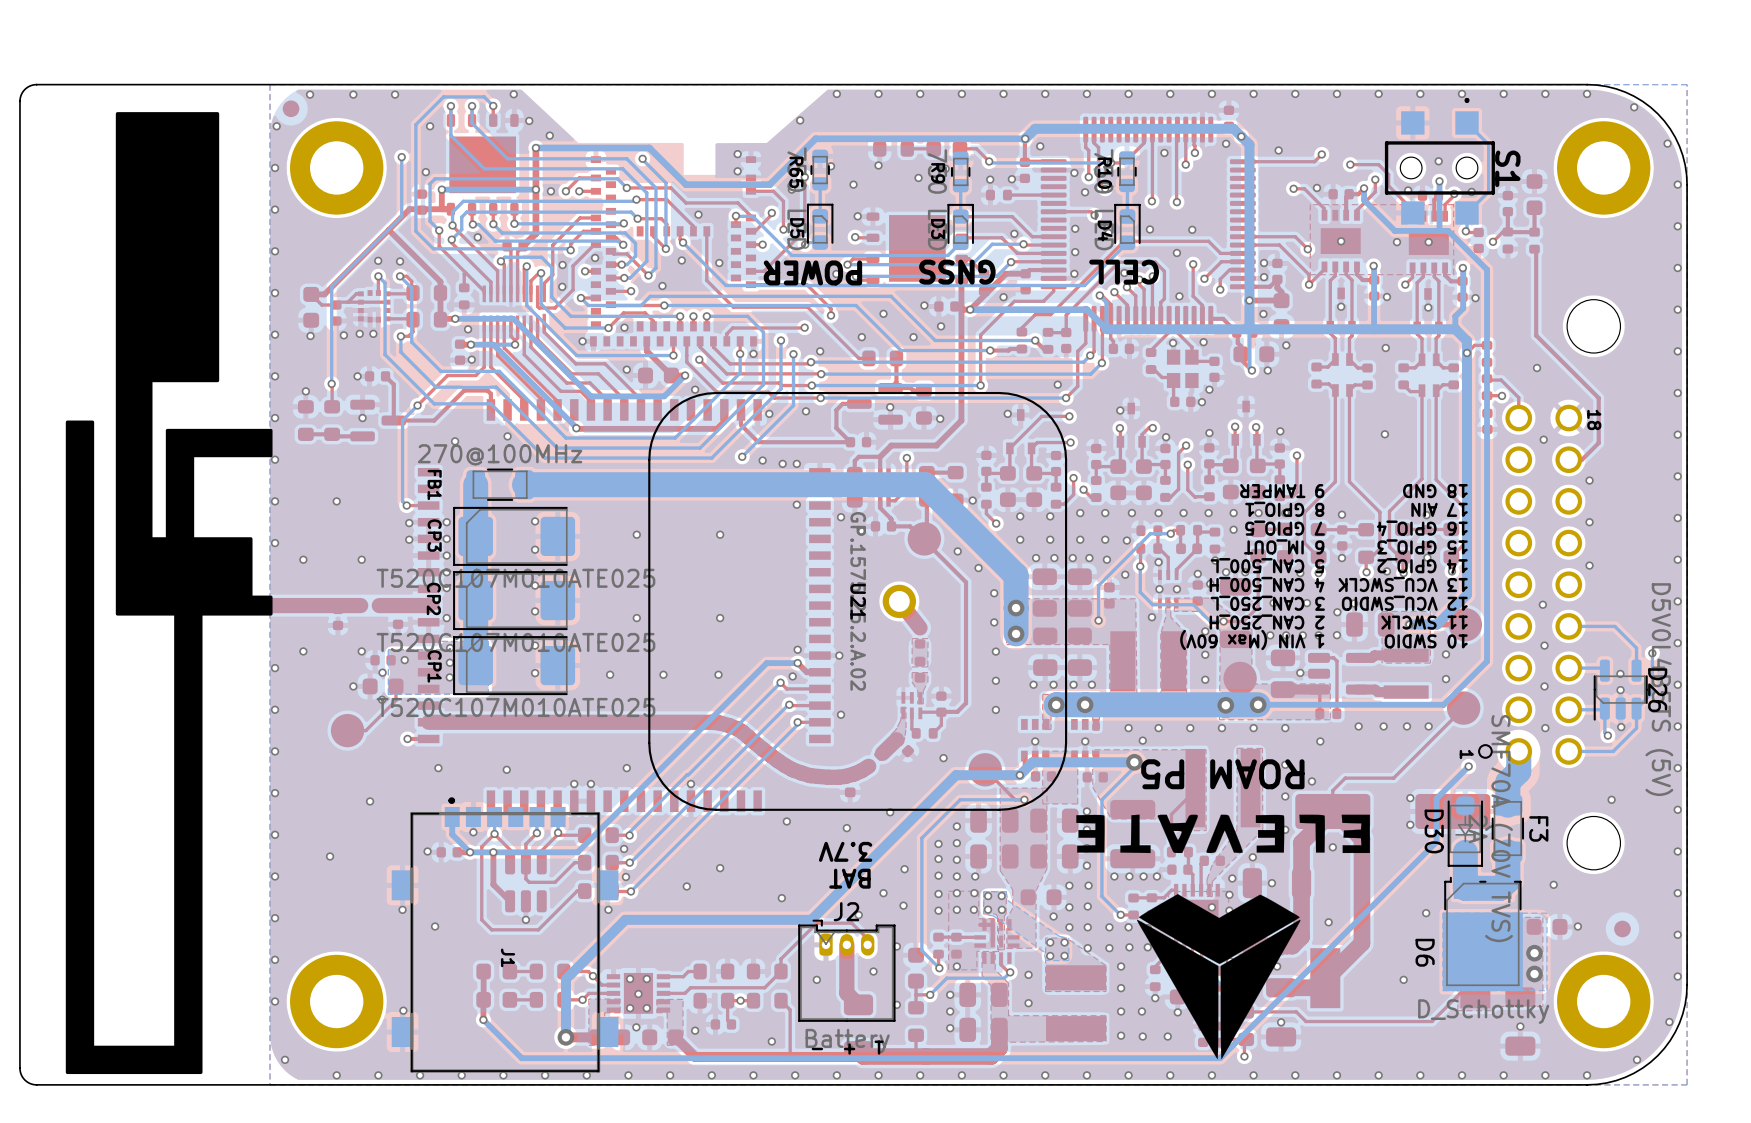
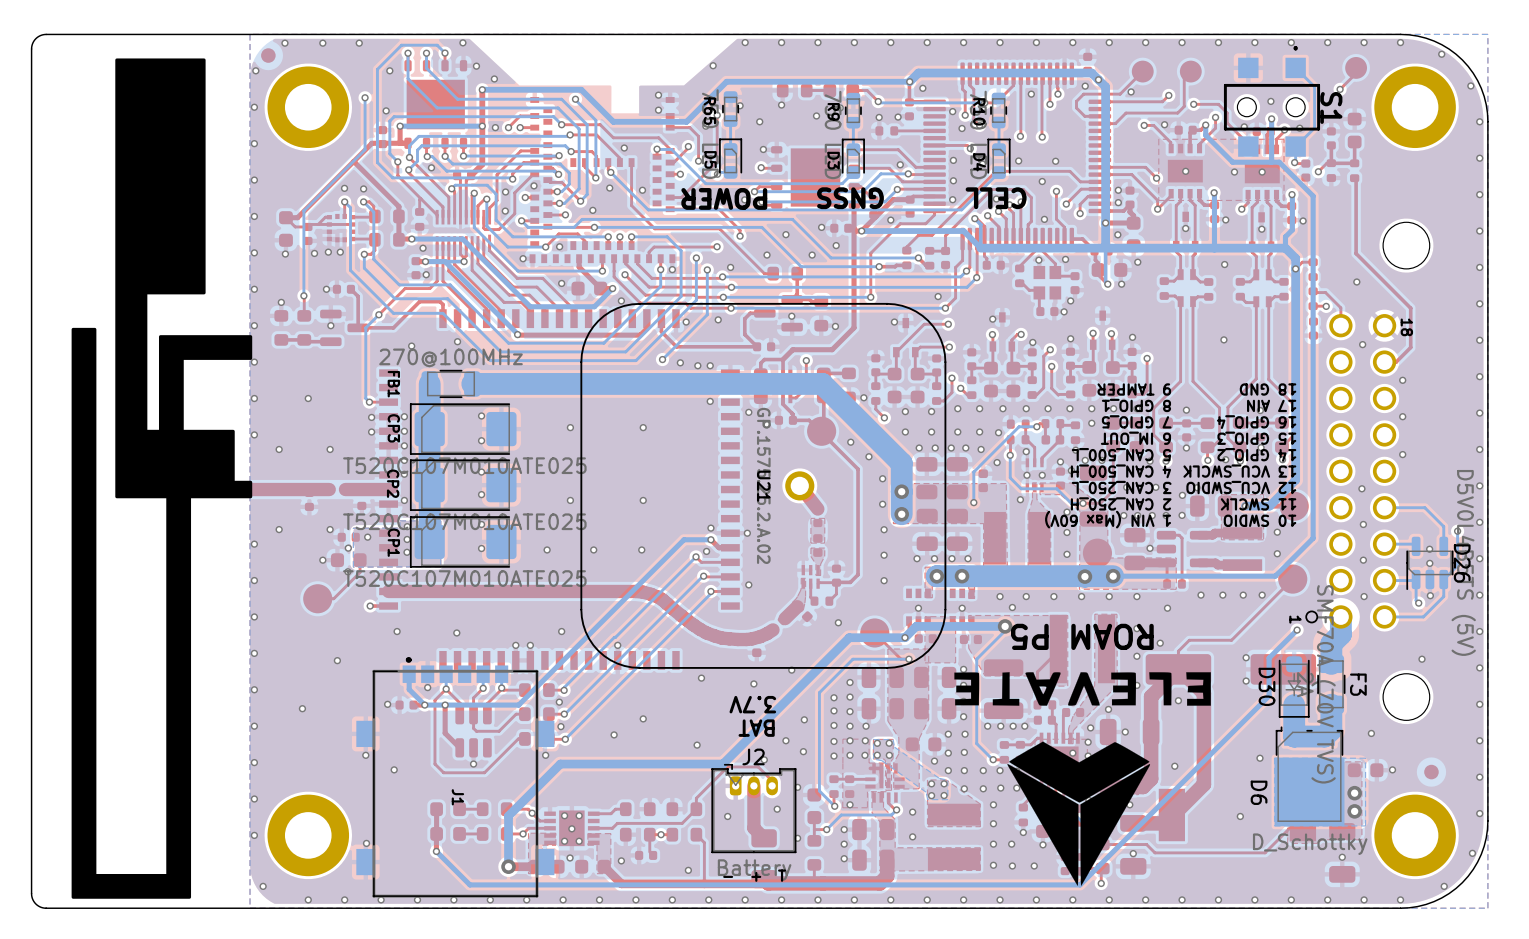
top track: none -> (1356, 67) (1356, 73) (1340, 89)
part: none -> (1356, 67)
top track: none -> (1142, 71) (1120, 94) (1083, 94) (1076, 101) (1076, 107) (1084, 116) (1099, 116)
part: none -> (1142, 71)
top track: none -> (1190, 71) (1184, 78) (1184, 106) (1177, 113) (1126, 113) (1115, 123) (1099, 123)
part: none -> (1190, 71)
via: none -> (1340, 89)

